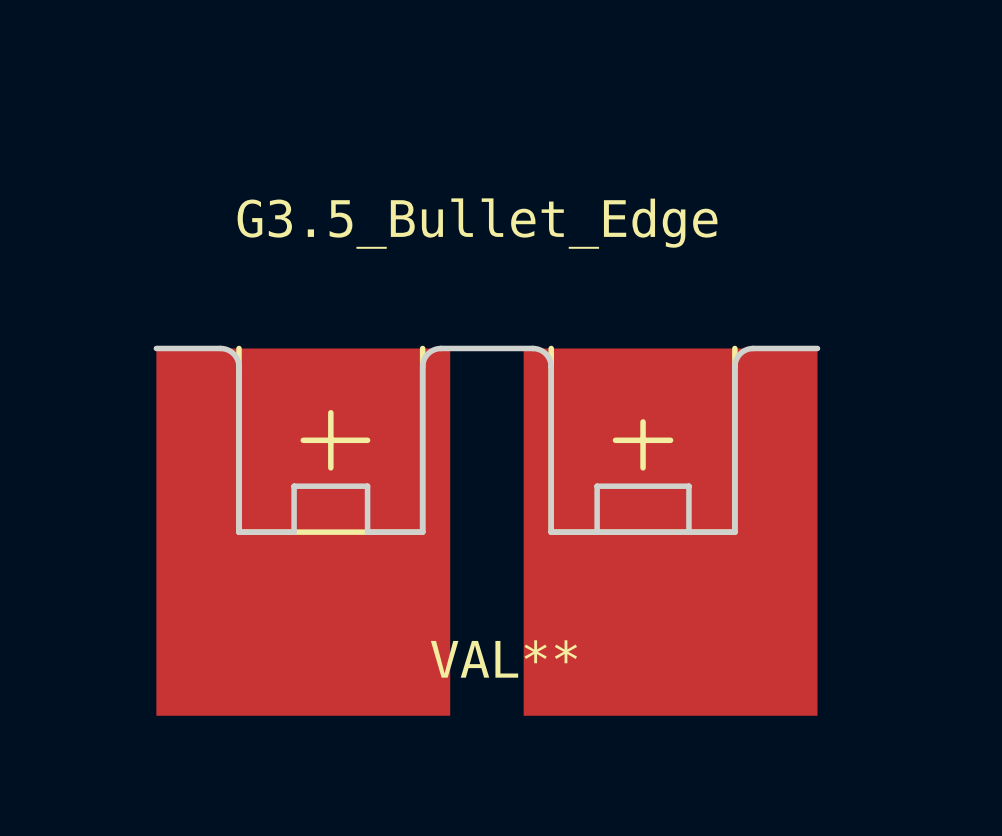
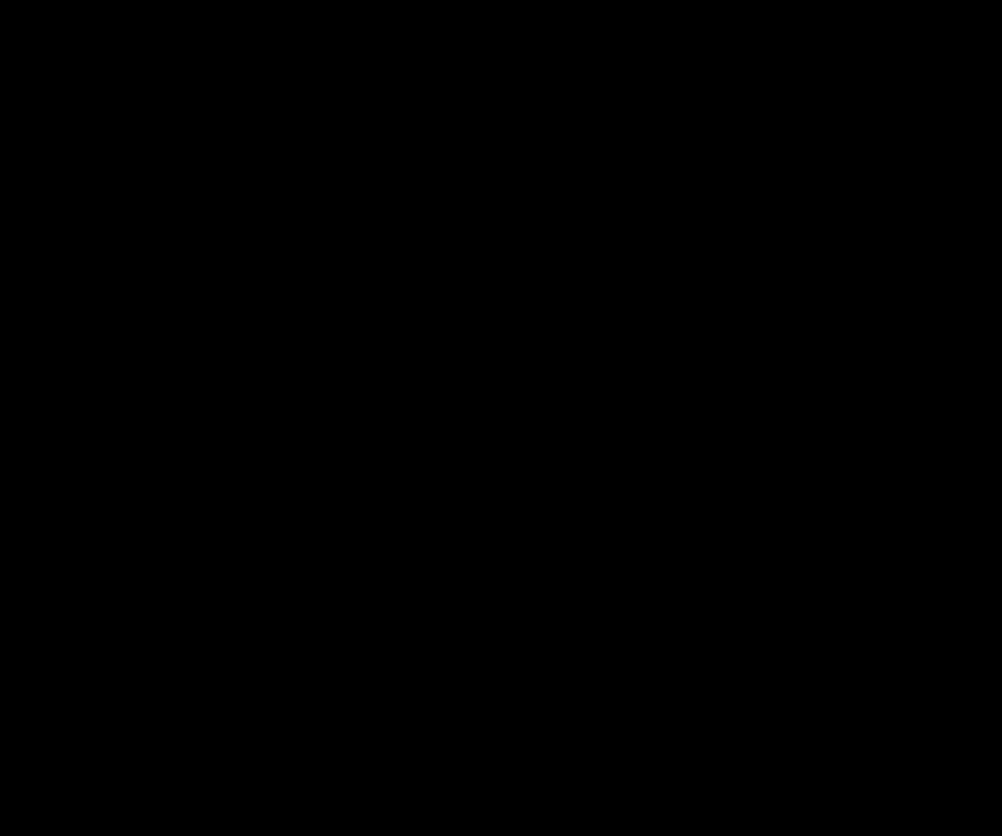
G3.5_Bullet_Edge: VAL** (486, 530) -> none

